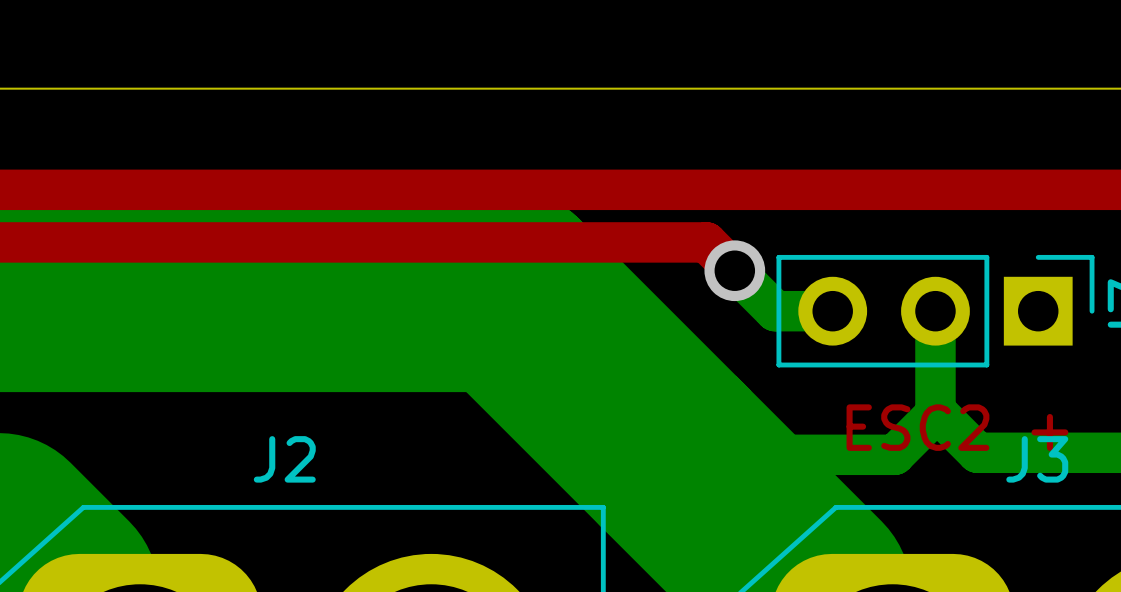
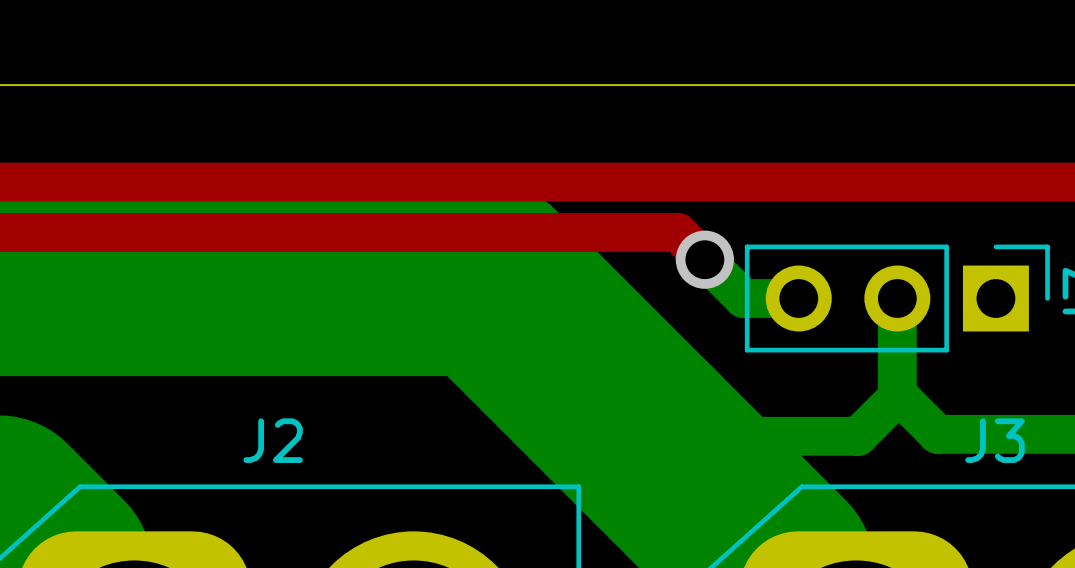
text: ESC2 + (957, 427) -> none

